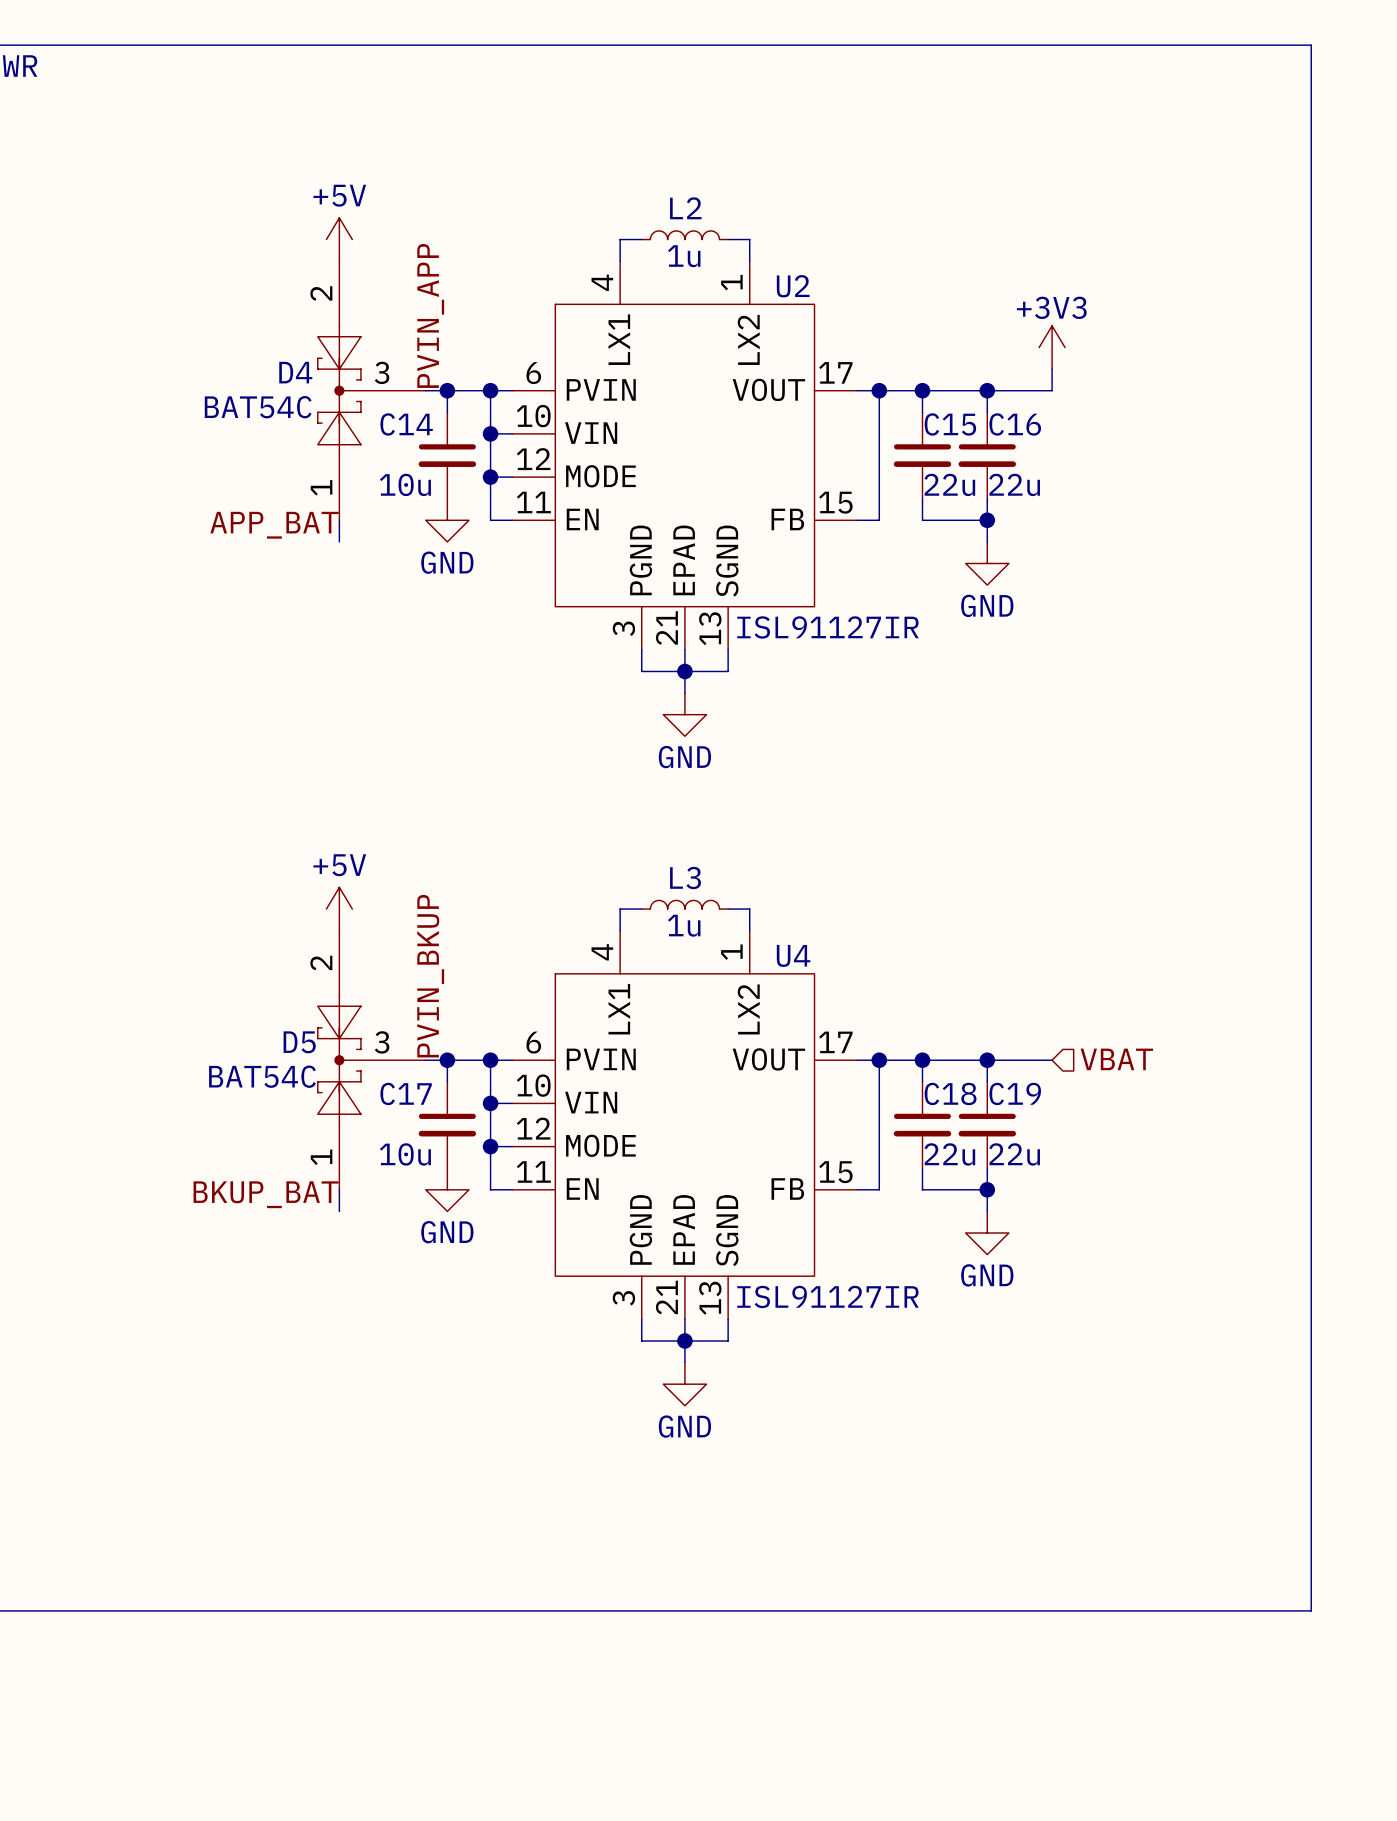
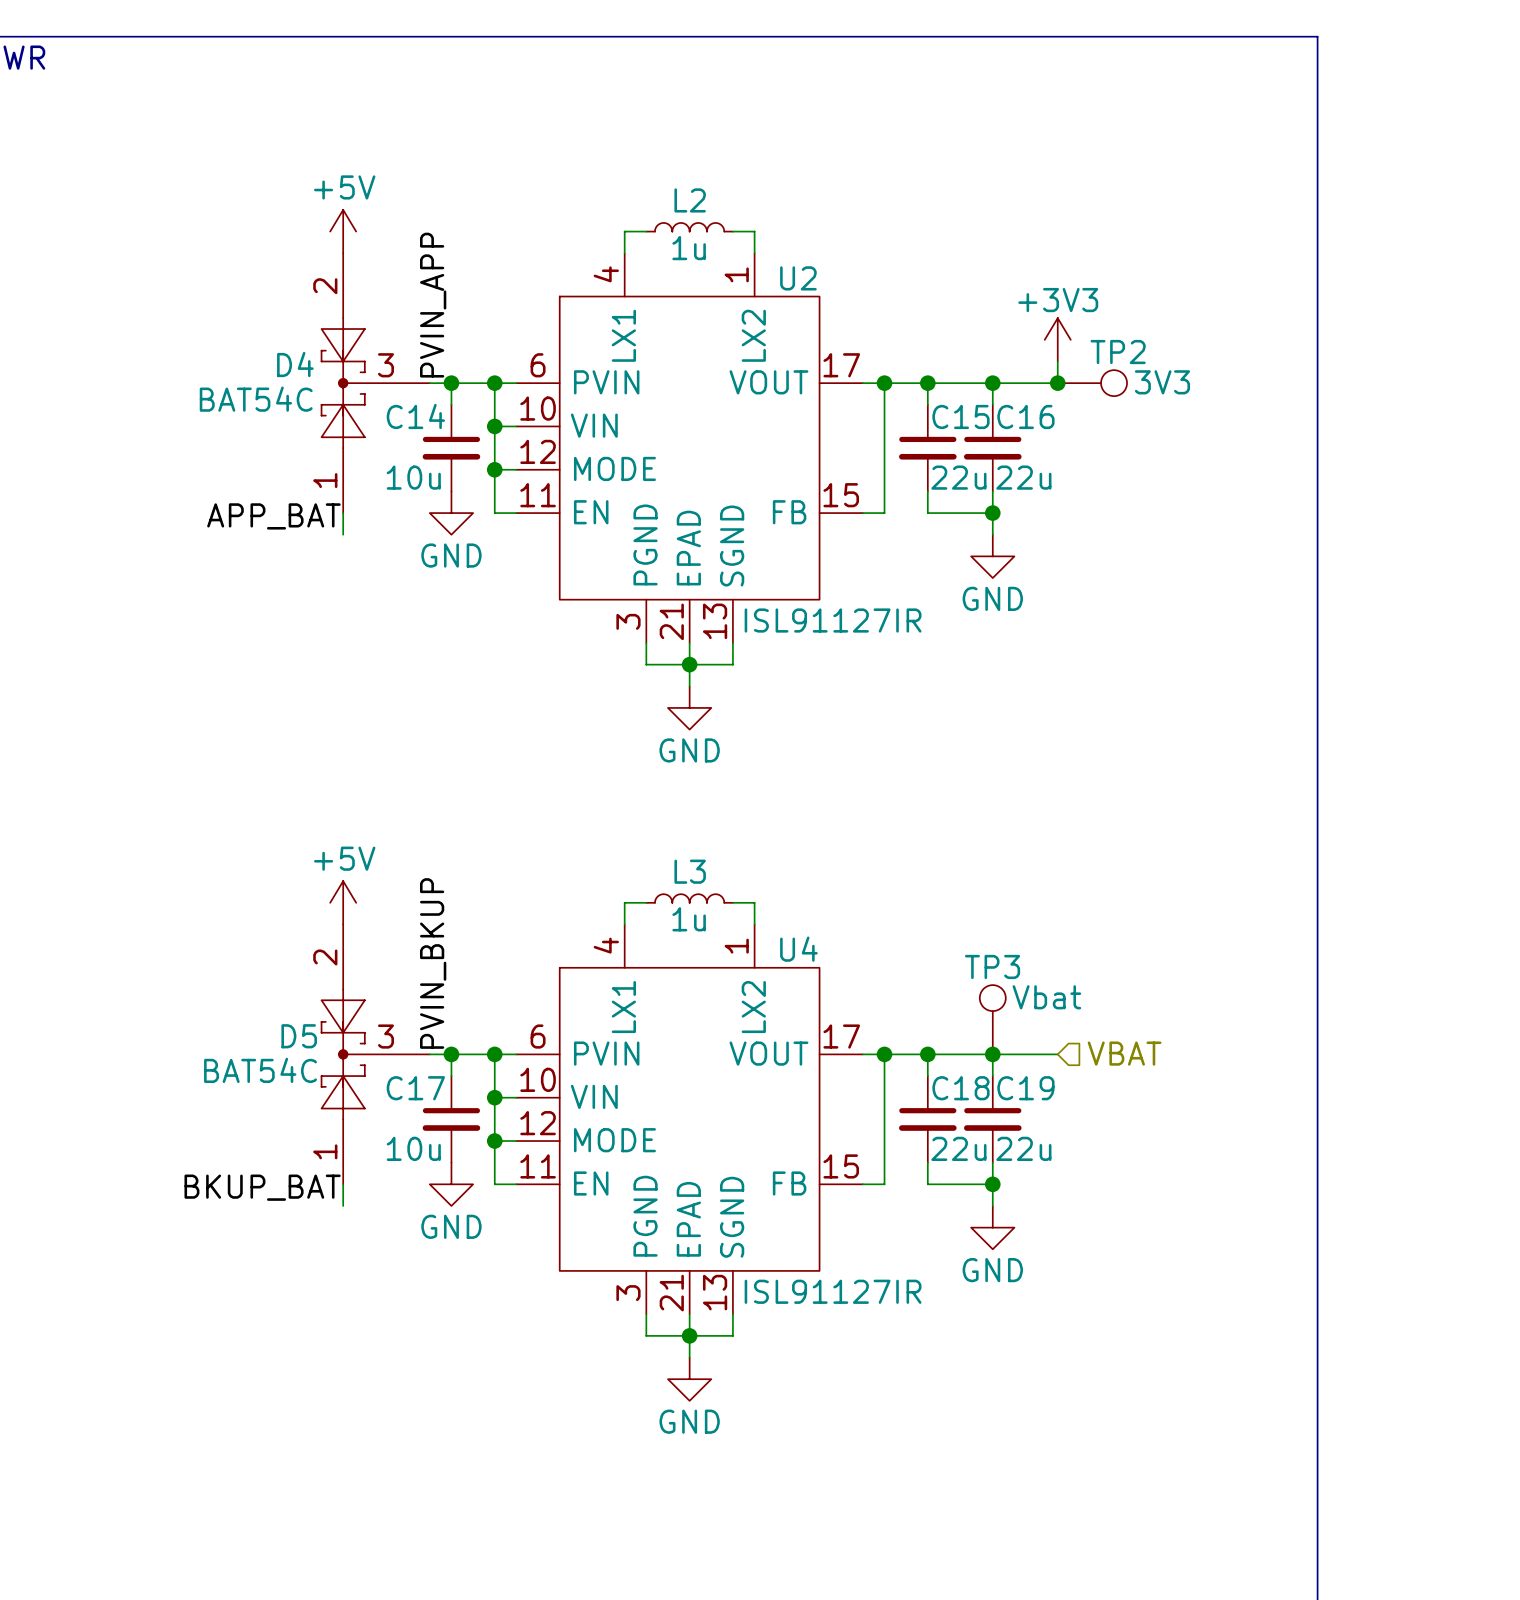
junction: none -> (1057, 383)
TP2: none -> 3V3 (1092, 383)
TP3: none -> Vbat (992, 1019)

